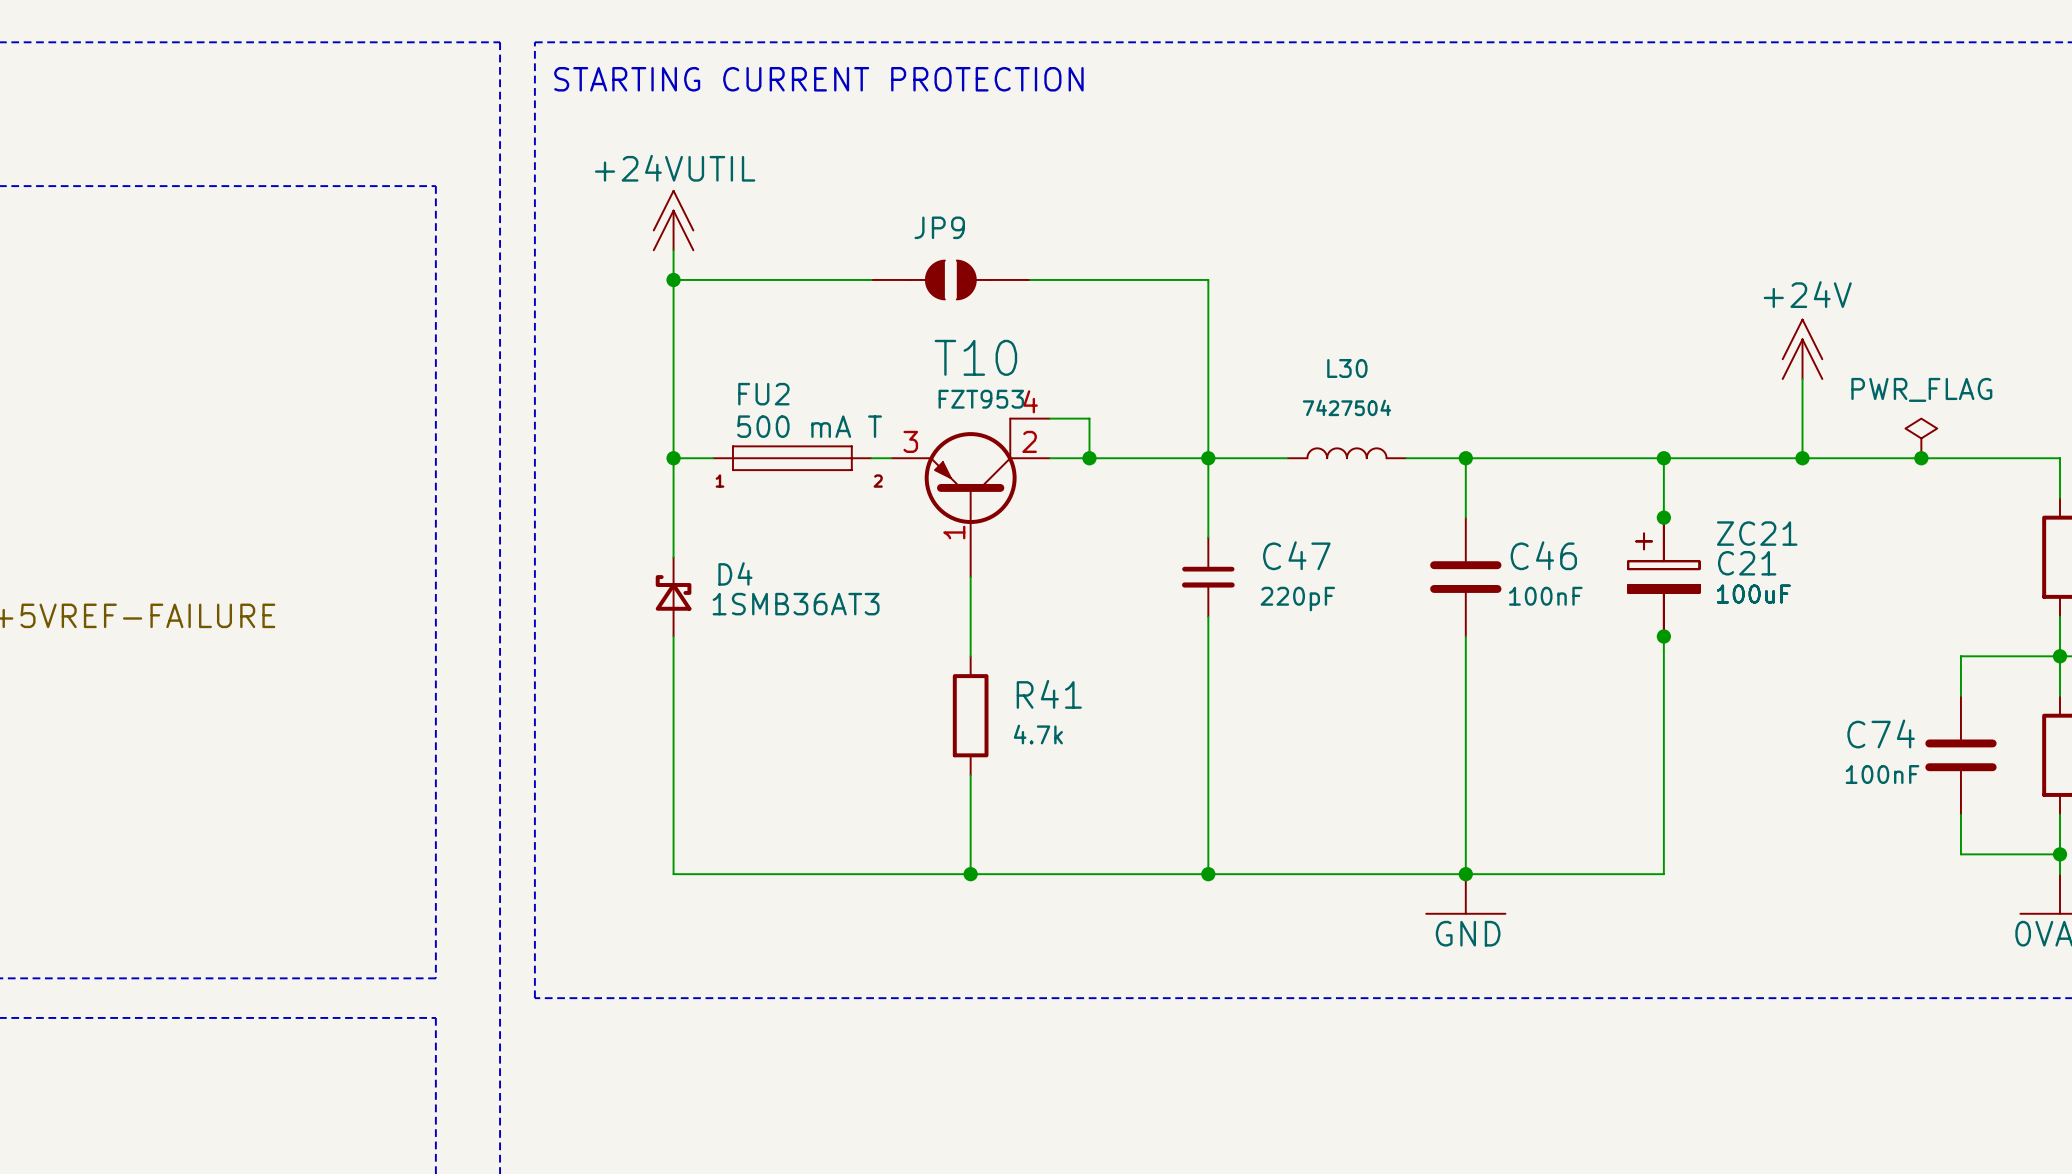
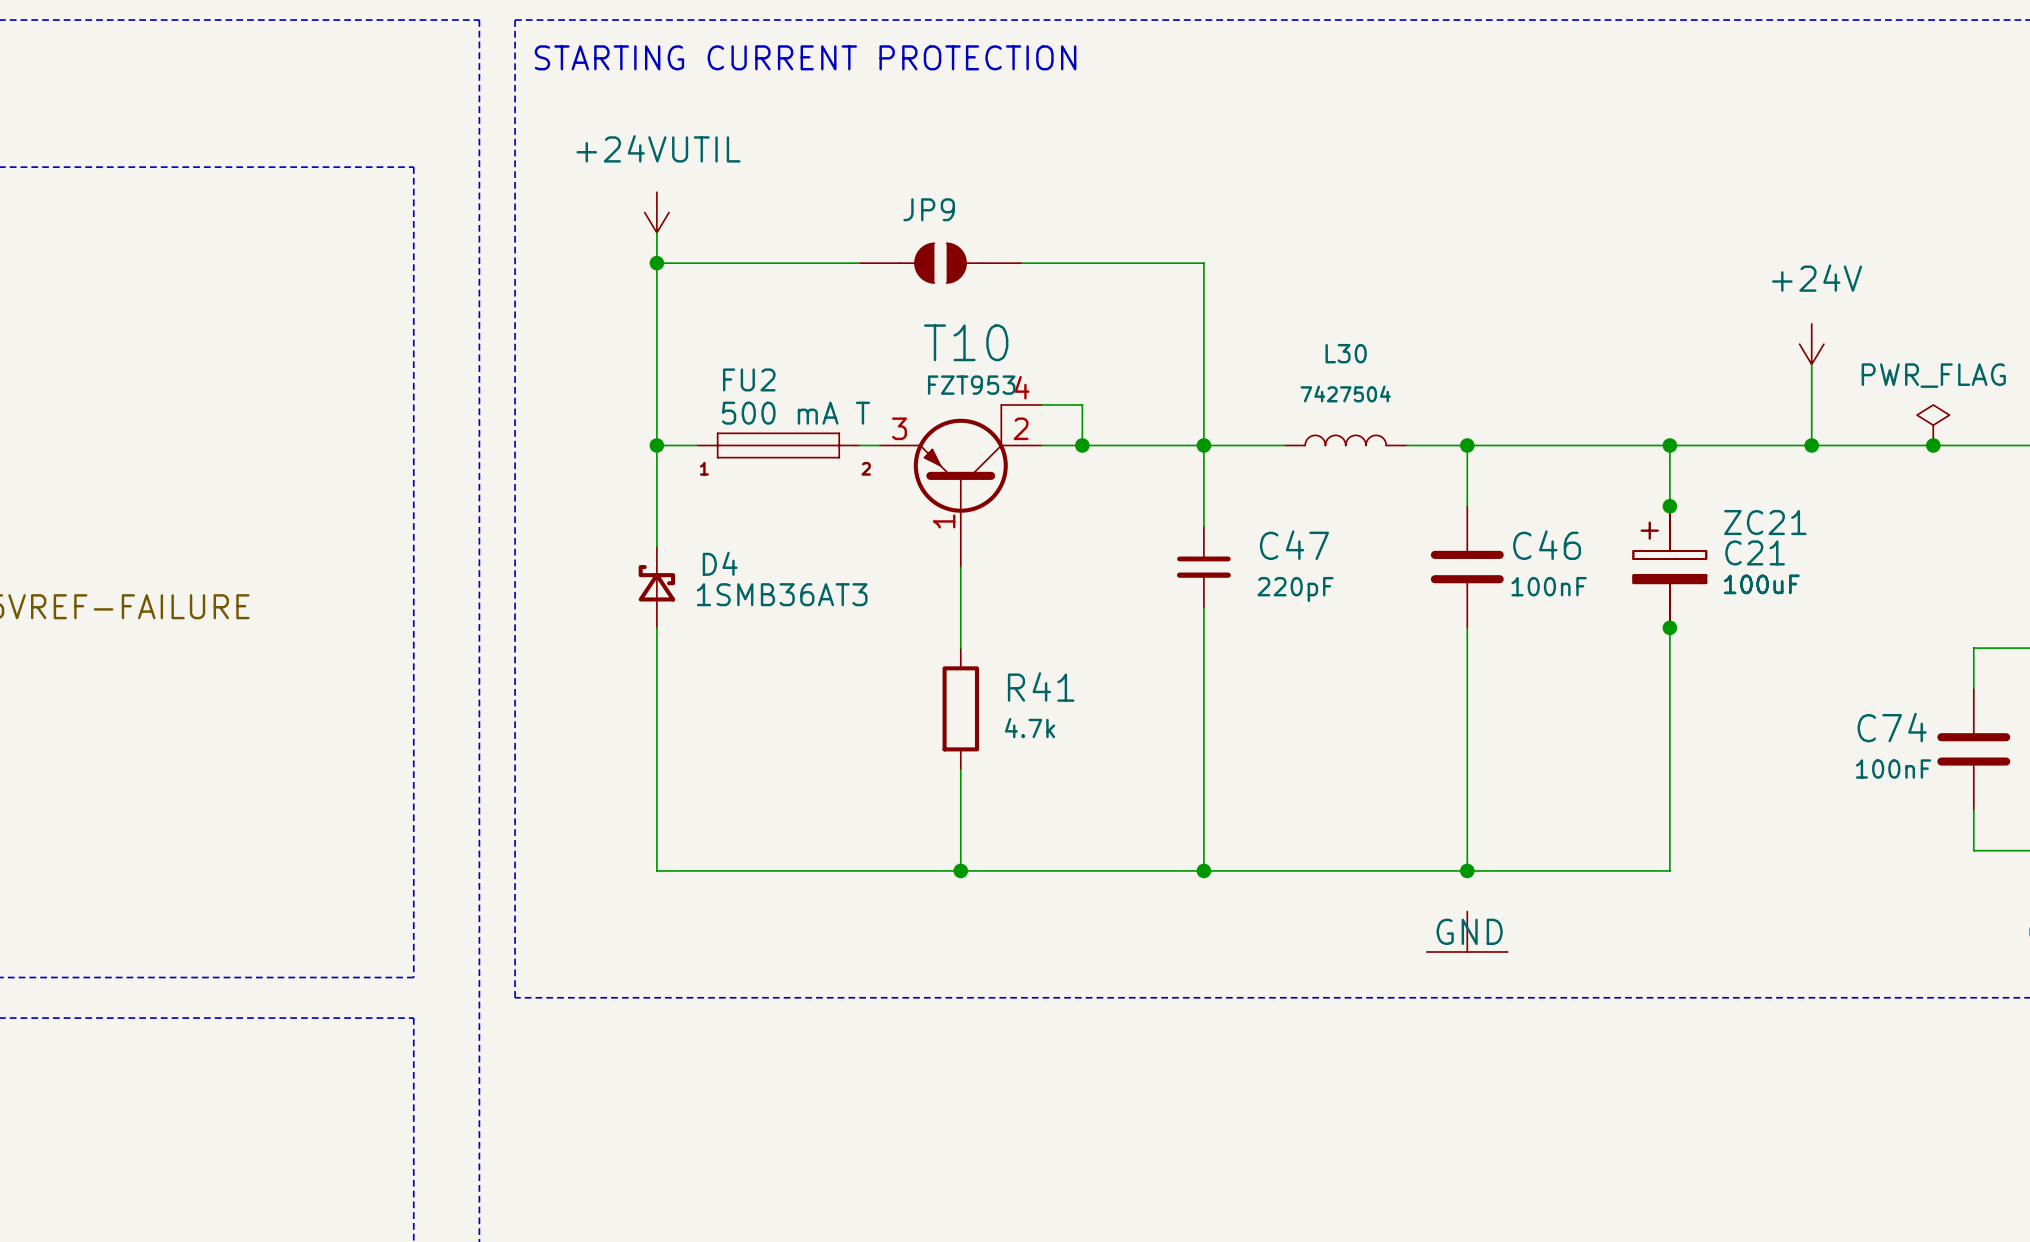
power symbol shape: [653, 190, 694, 251] -> [644, 192, 670, 233]
power symbol shape: [1782, 319, 1823, 380] -> [1799, 323, 1824, 365]
power symbol position: GND (1465, 893) -> GND (1467, 931)

